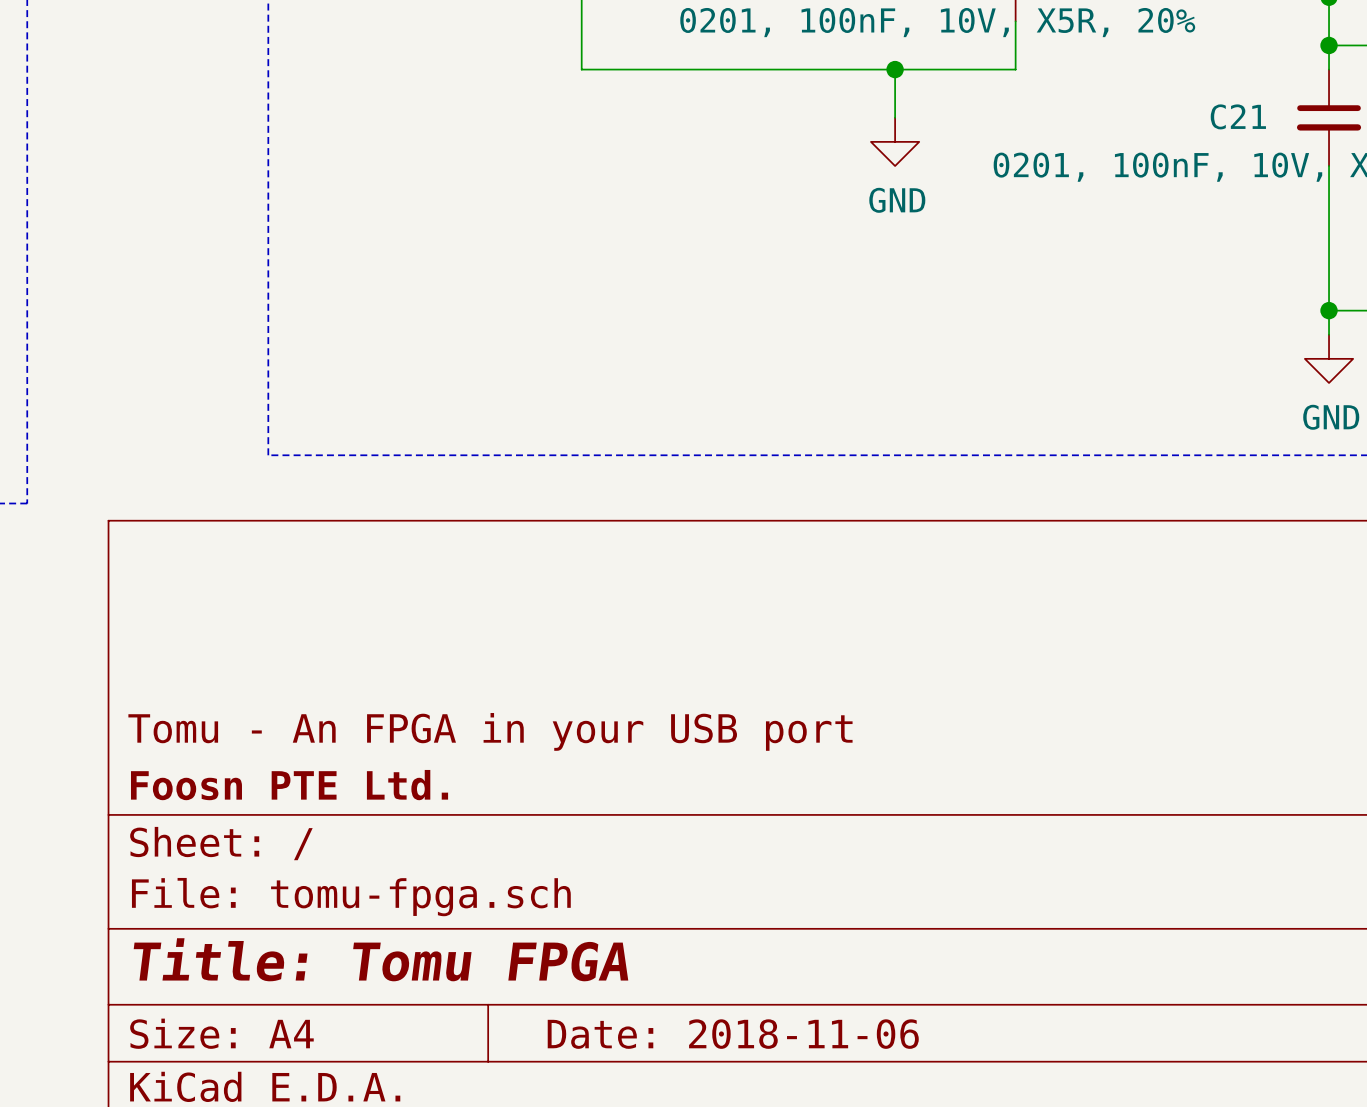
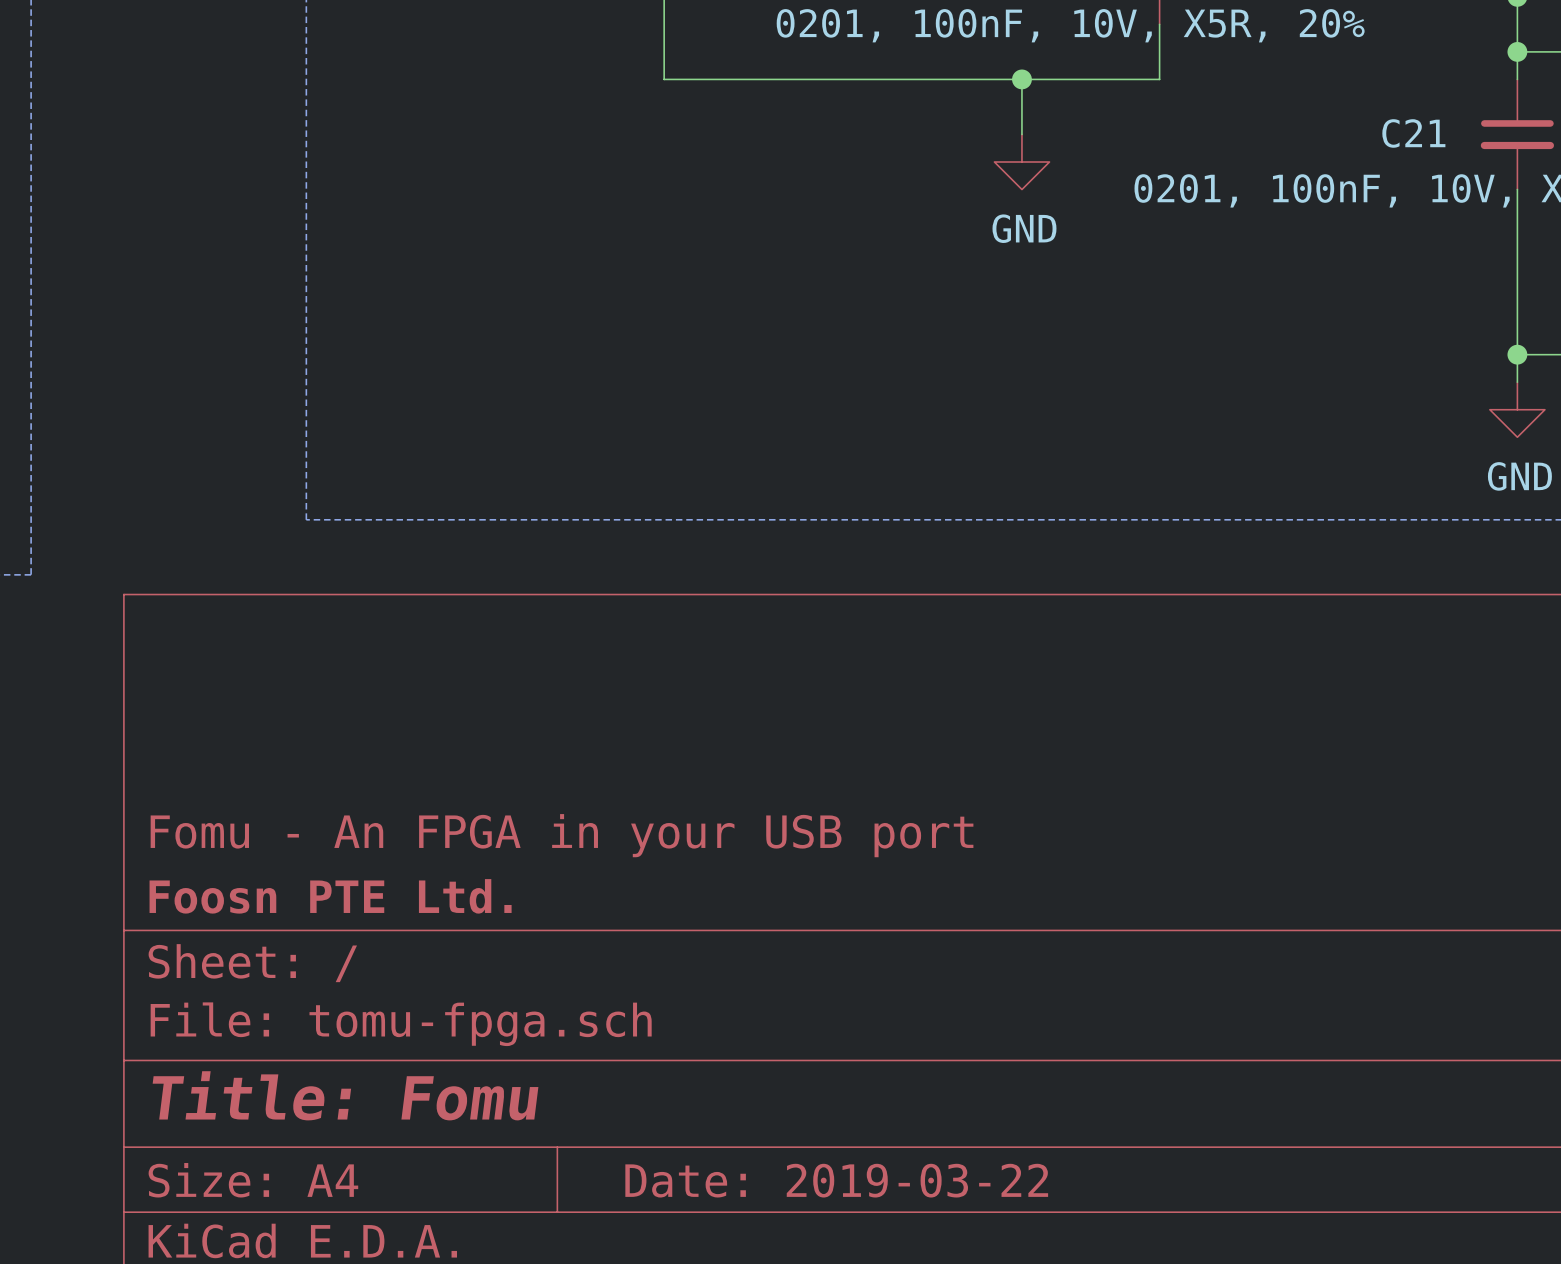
title block: Tomu - An FPGA in your USB port (490, 731) -> Fomu - An FPGA in your USB port (562, 835)
title block: Title: Tomu FPGA (380, 959) -> Title: Fomu (345, 1095)
title block: Date: 2018-11-06 (733, 1034) -> Date: 2019-03-22 (836, 1180)

